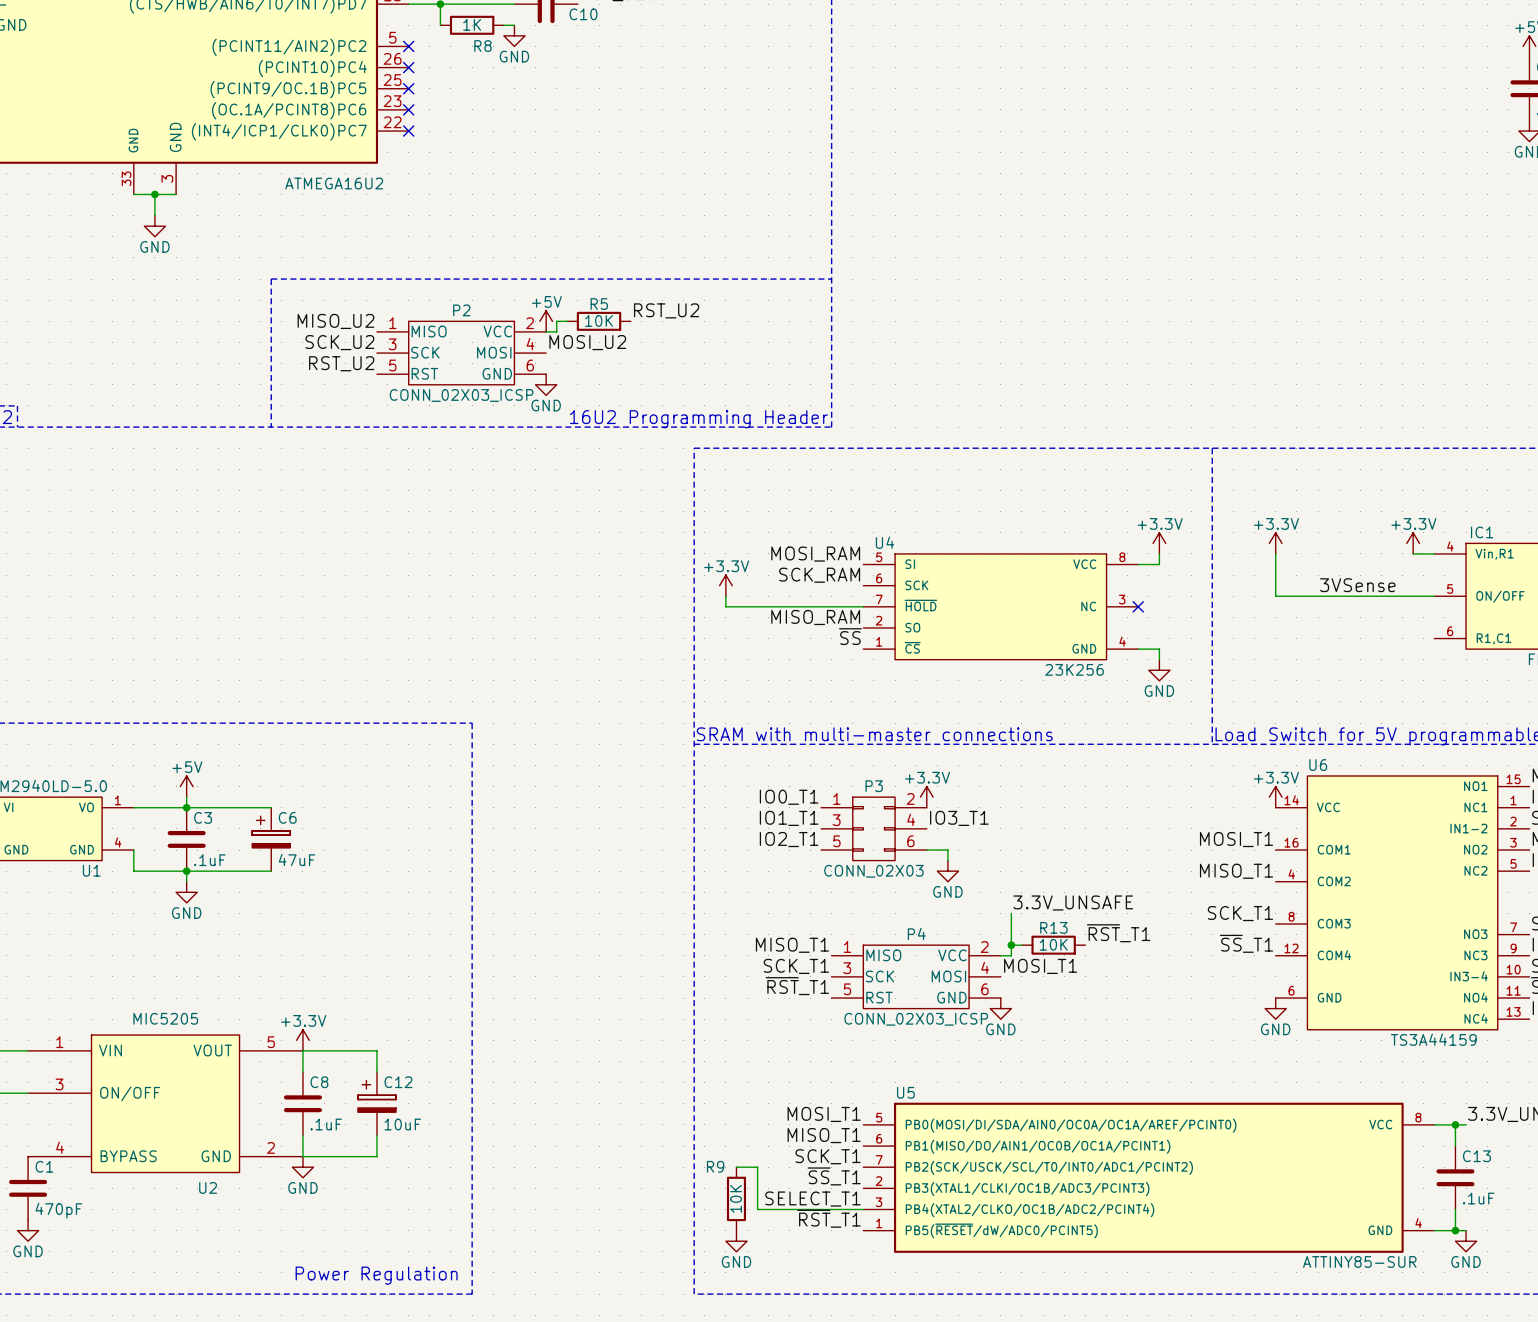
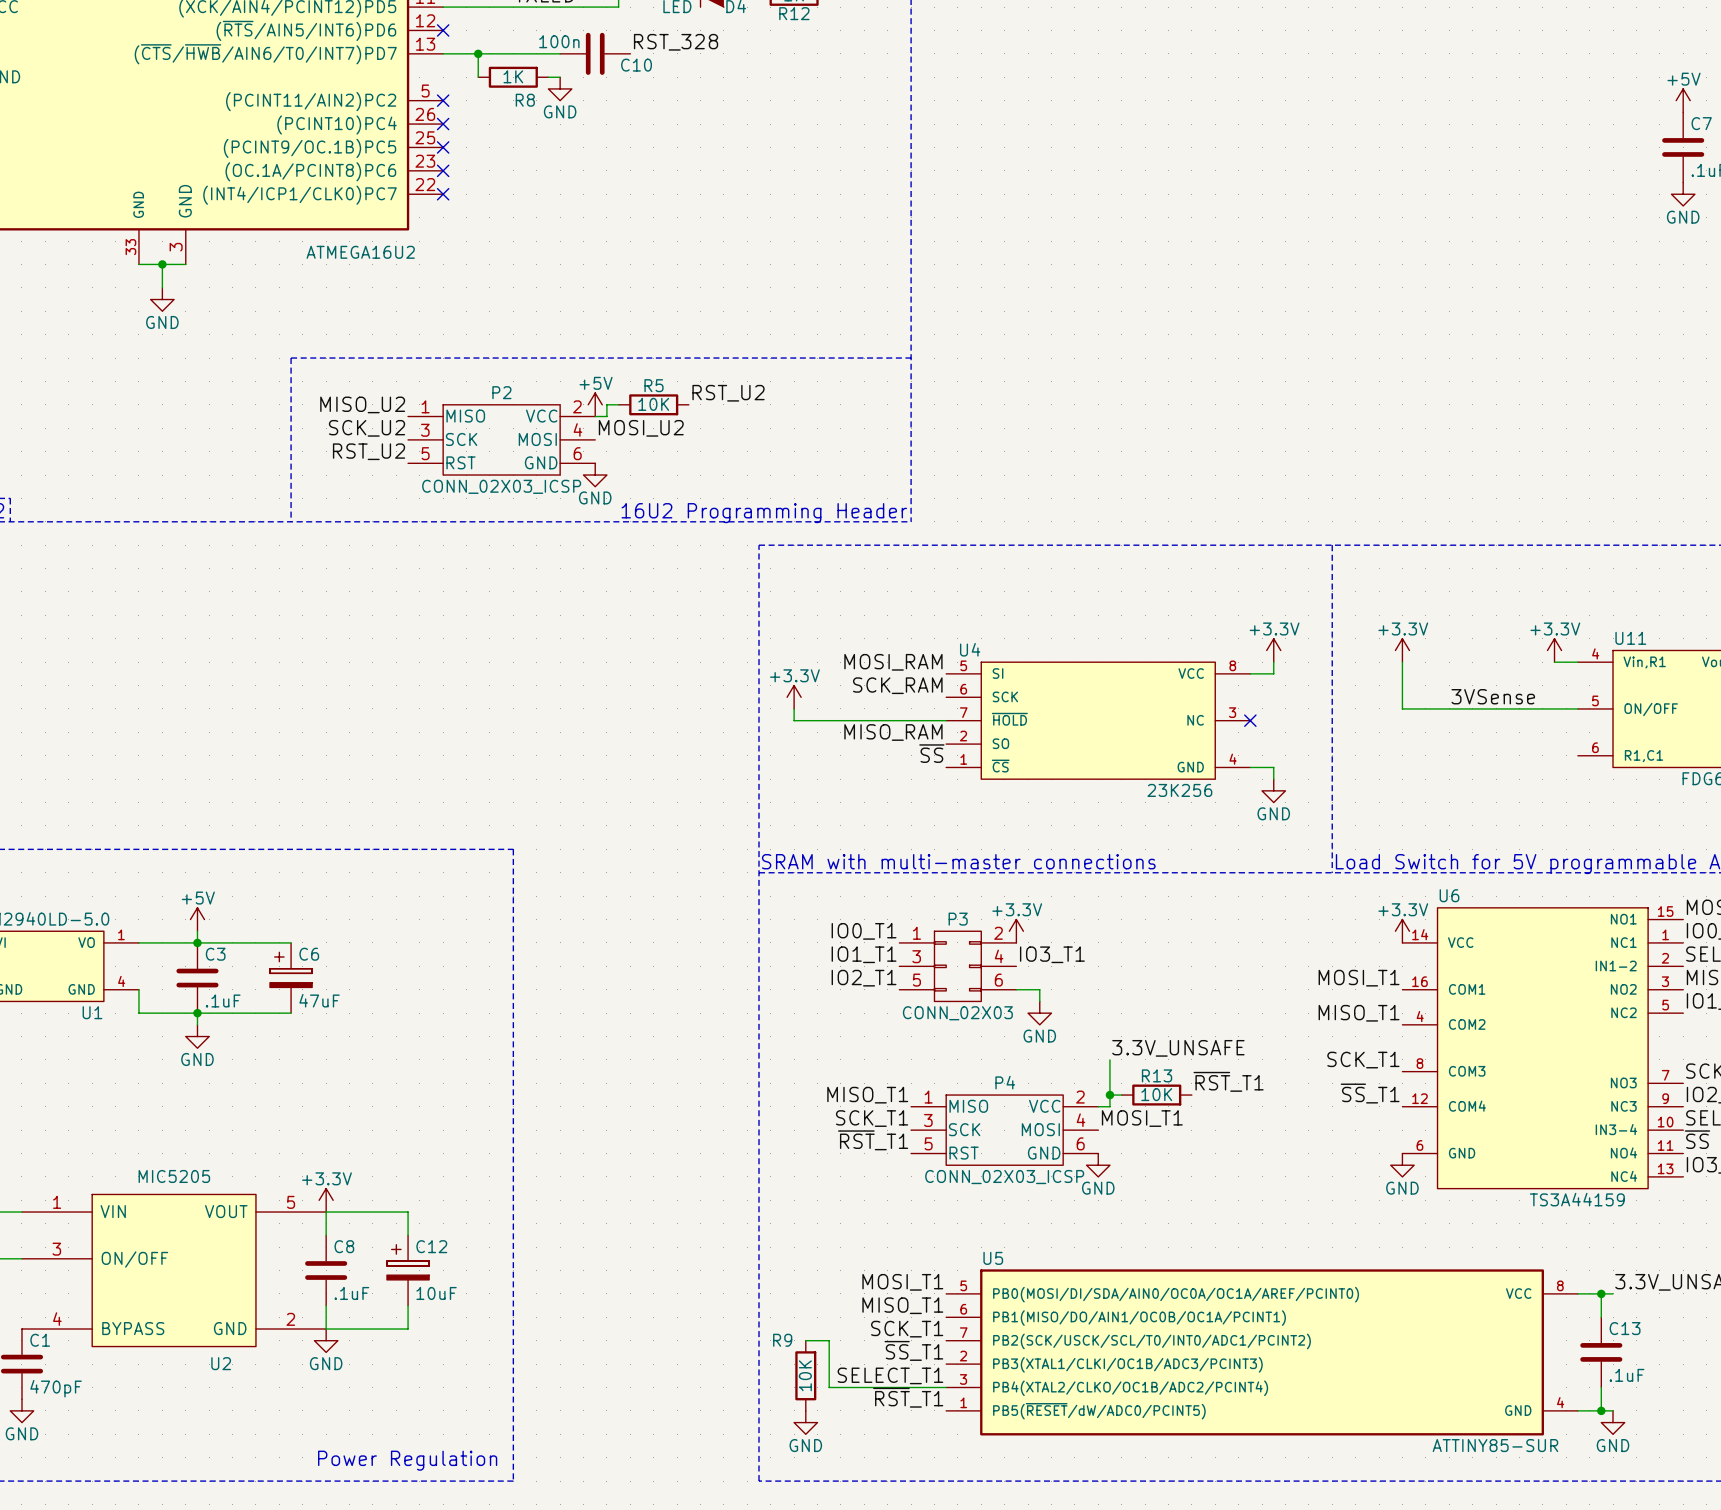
IC1 name: IC1 (1482, 532) -> U11 (1630, 638)

